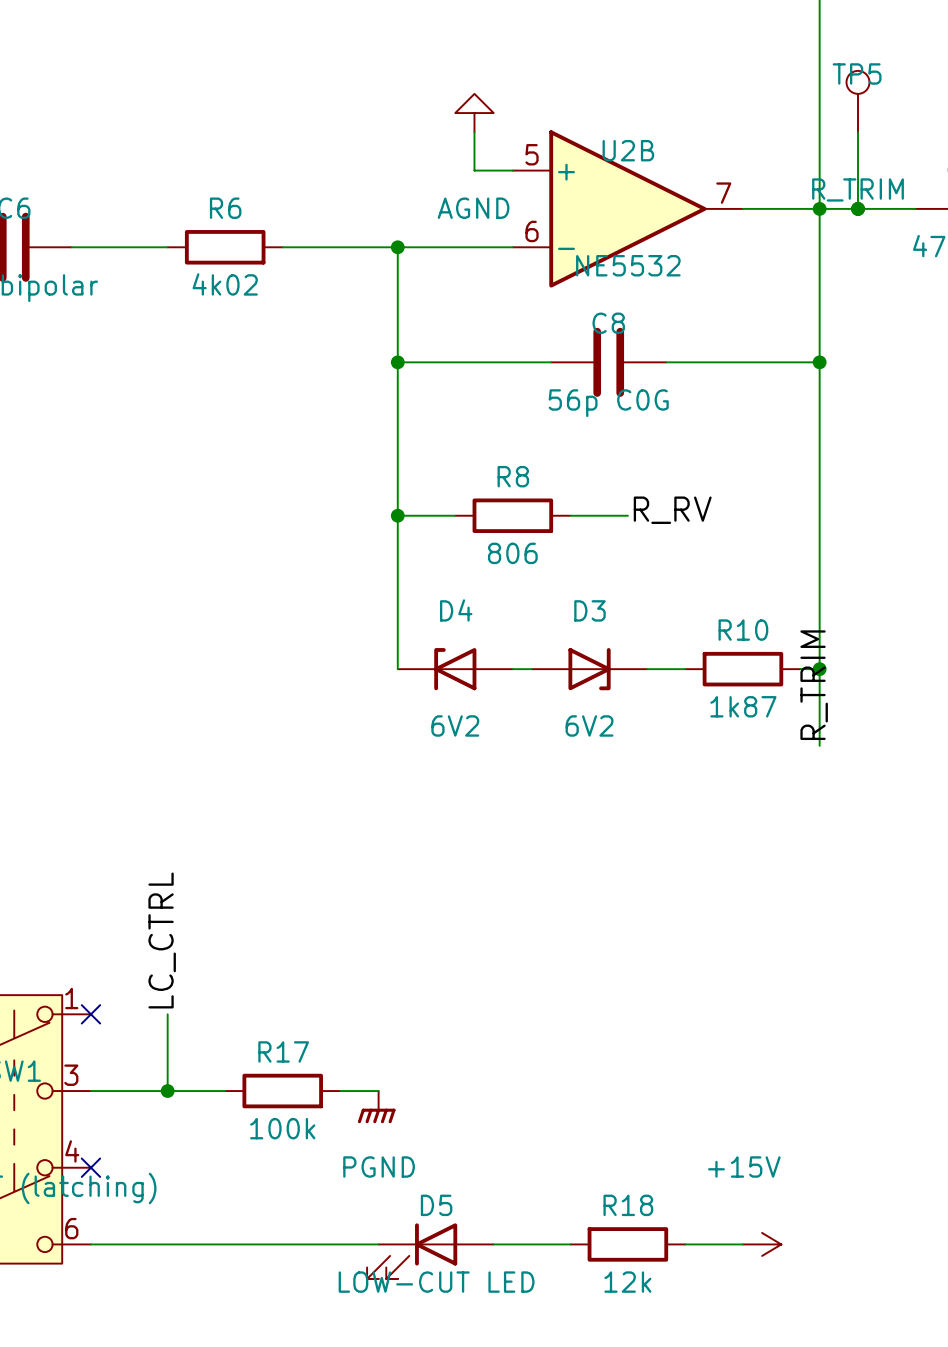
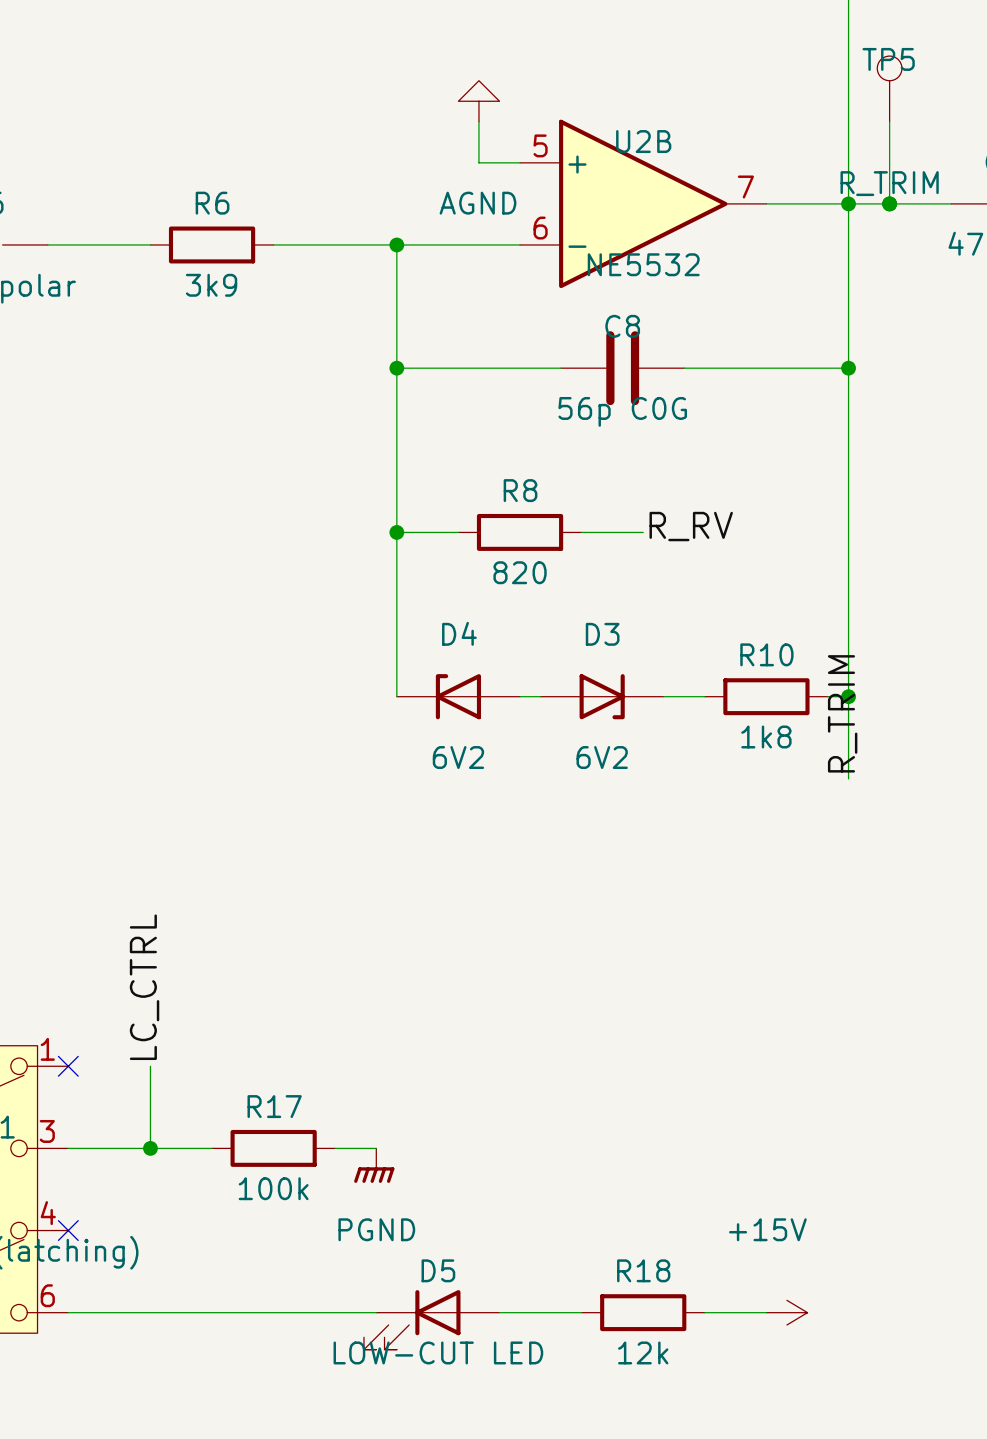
R6 value: 4k02 (225, 284) -> 3k9 (211, 285)
R8 value: 806 (512, 553) -> 820 (520, 572)
R10 value: 1k87 (743, 706) -> 1k8 (766, 736)

